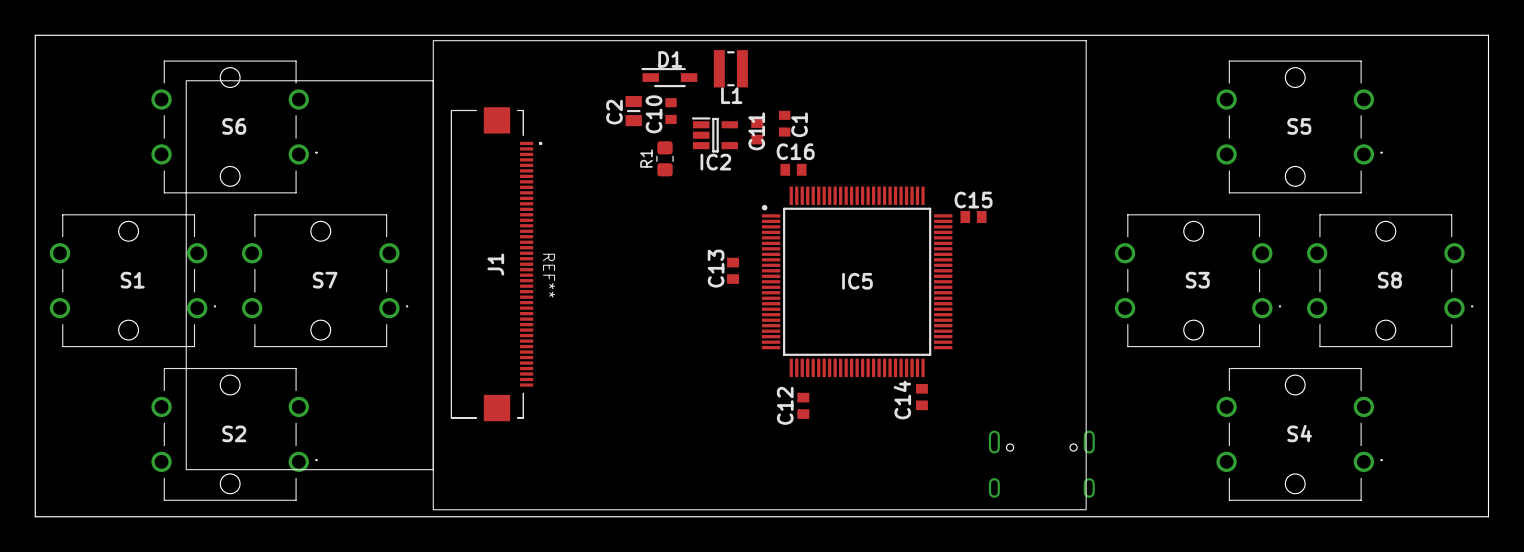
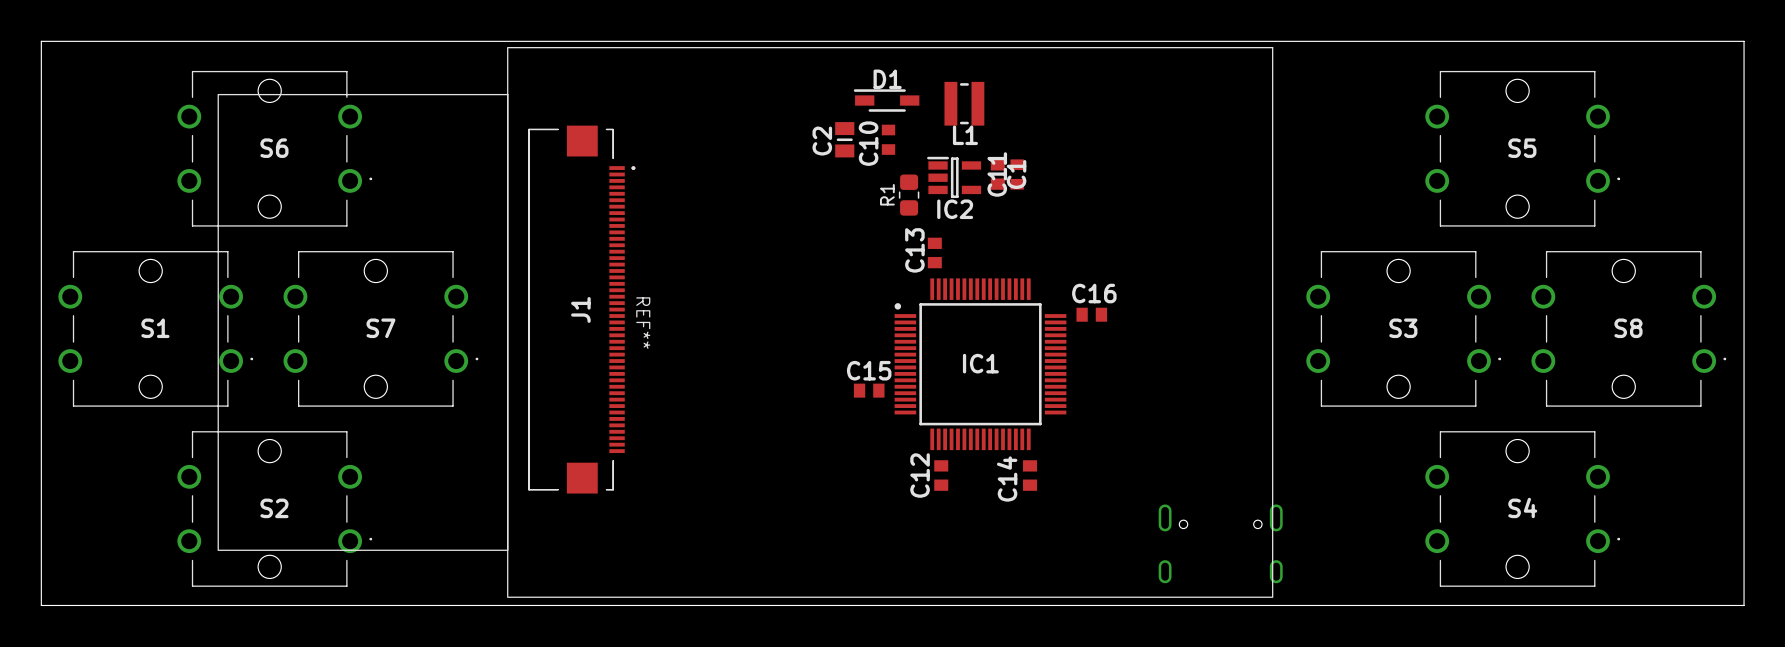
L1 position: (730, 68) -> (964, 103)
D1 position: (669, 77) -> (886, 100)
C2 position: (633, 111) -> (844, 139)
C10 position: (671, 111) -> (888, 139)
C1 position: (784, 123) -> (1017, 174)
C1 name position: C1 (799, 124) -> C1 (1016, 174)
C11 position: (757, 131) -> (997, 174)
IC2 position: (714, 134) -> (954, 177)
R1 position: (664, 158) -> (909, 195)
C16 position: (793, 169) -> (1091, 314)
C15 position: (973, 217) -> (869, 390)
C13 position: (733, 270) -> (934, 252)
IC5: (857, 281) -> none
IC1: none -> (980, 364)
C14 position: (921, 397) -> (1030, 475)

